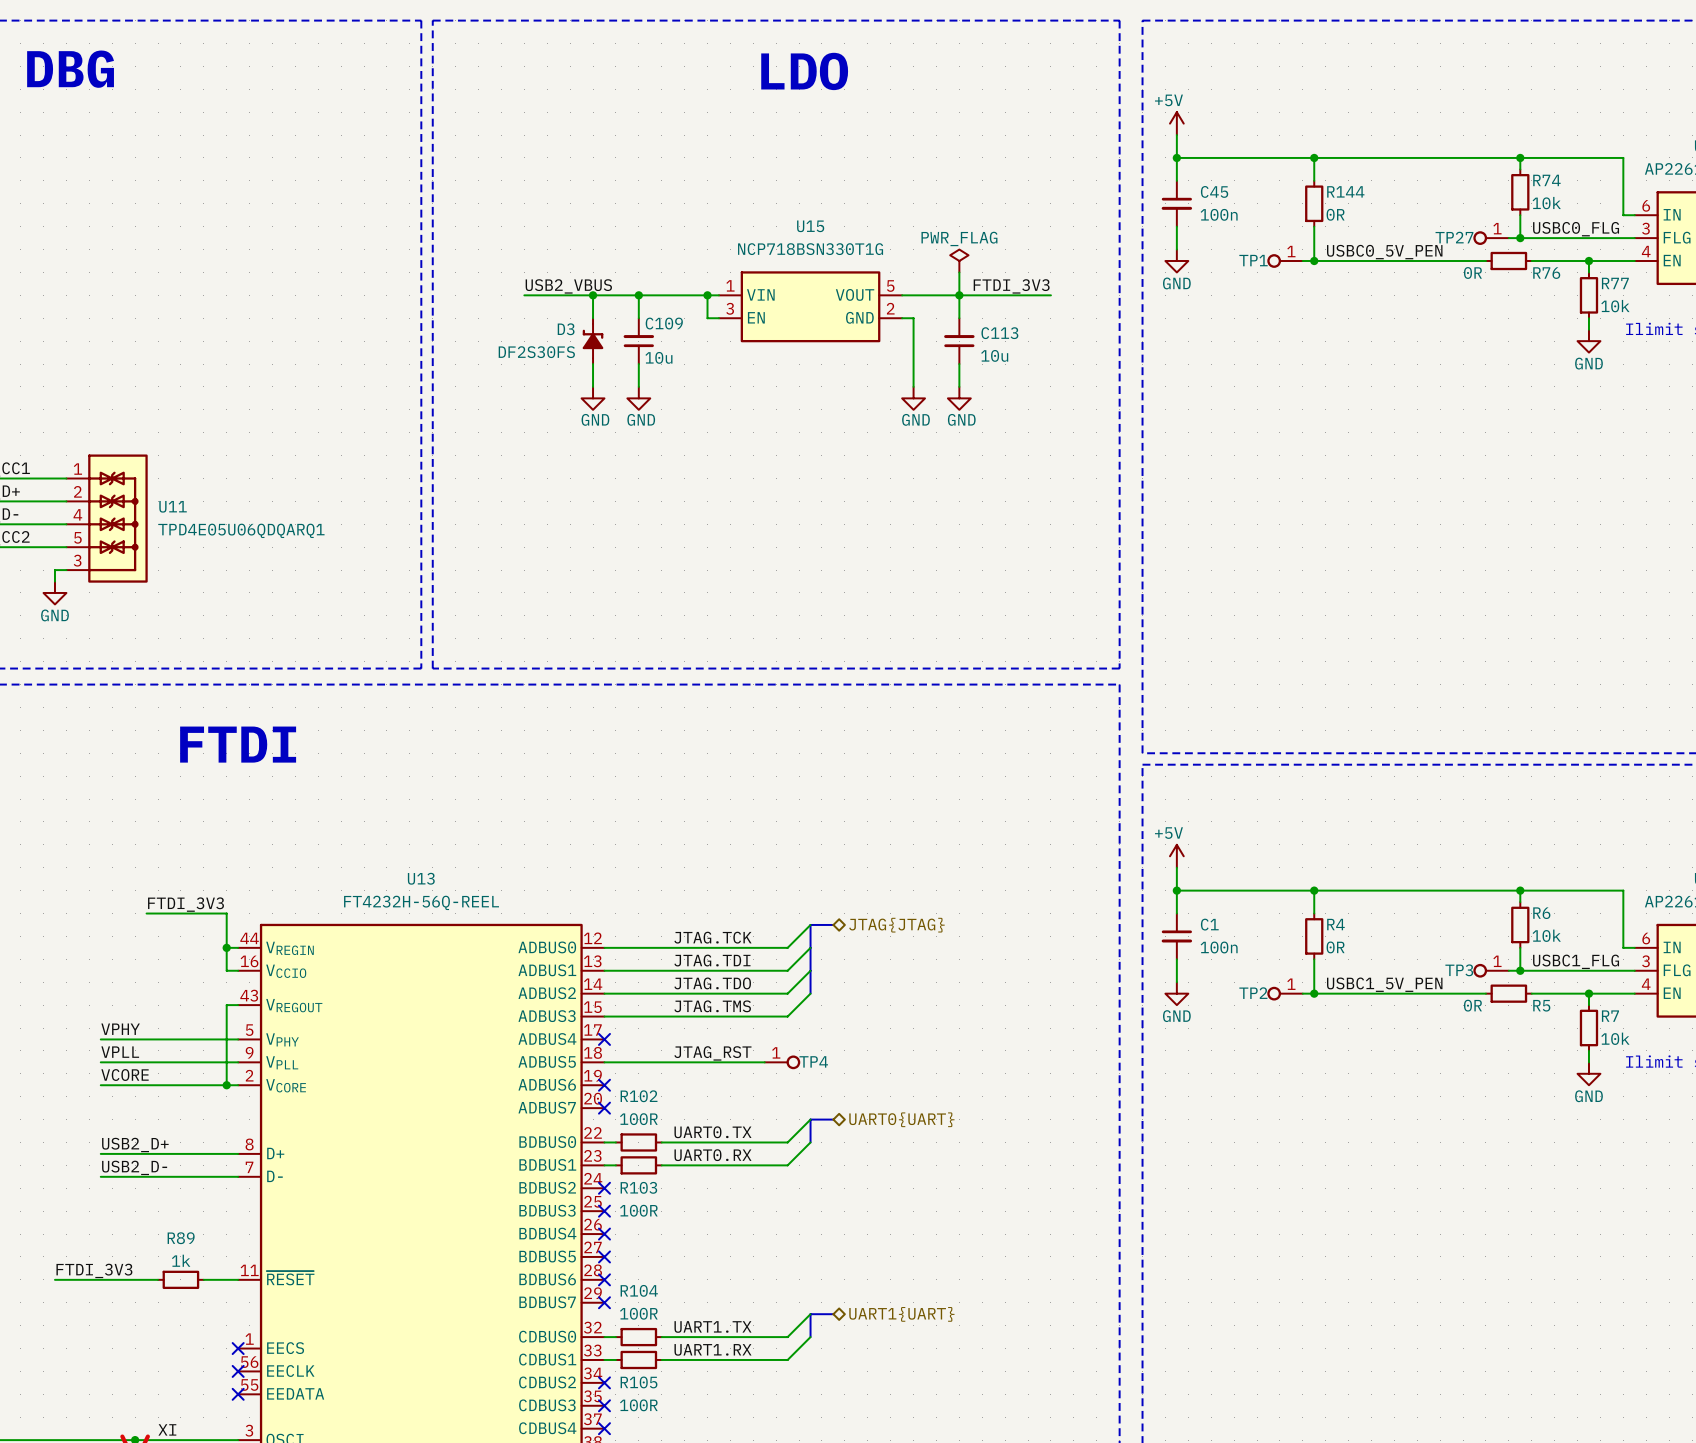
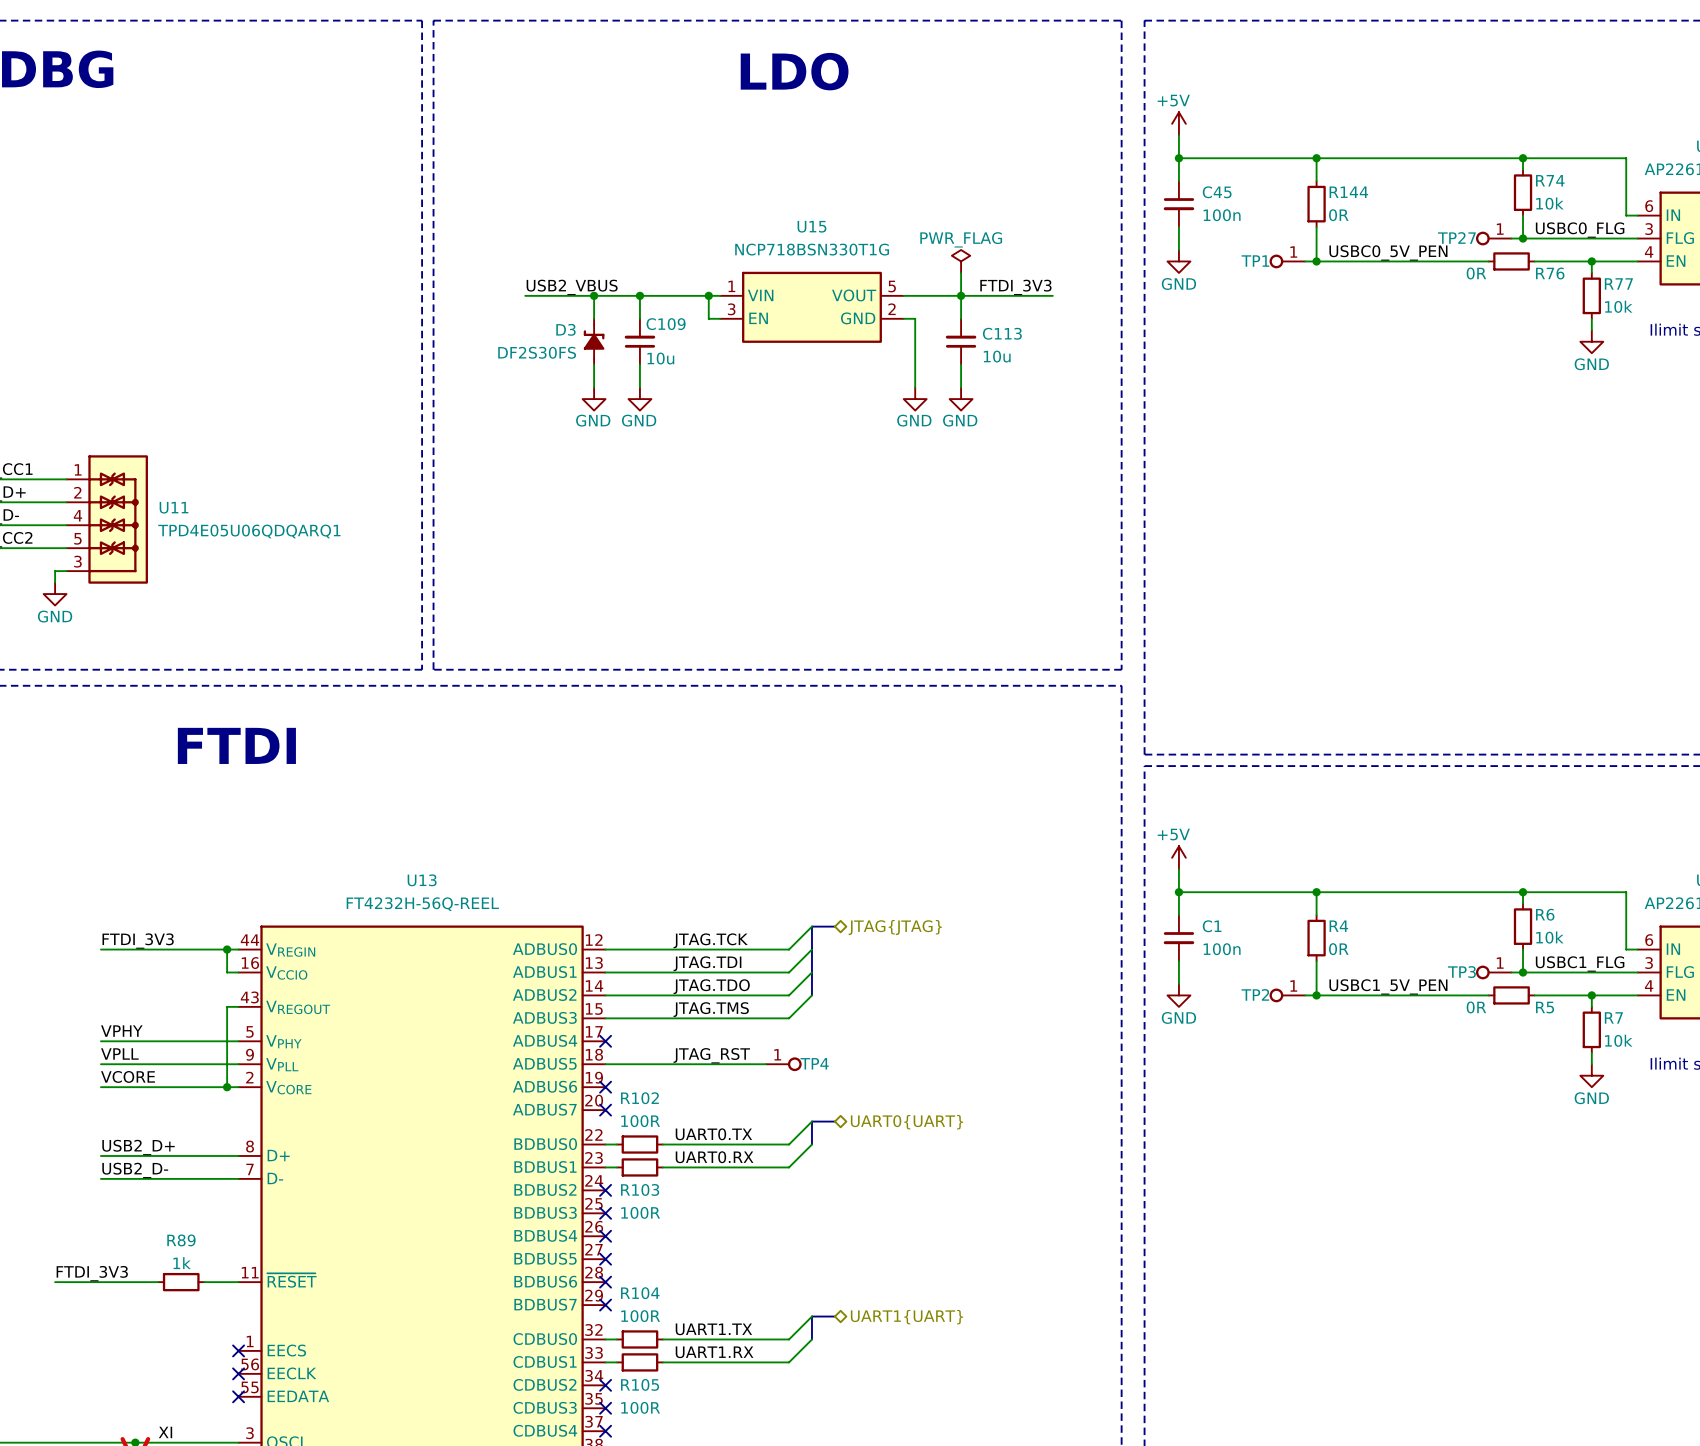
label position: FTDI_3V3 (186, 904) -> FTDI_3V3 (138, 941)
wire: (146, 913) (226, 913) (226, 947) -> (100, 949) (227, 949)

